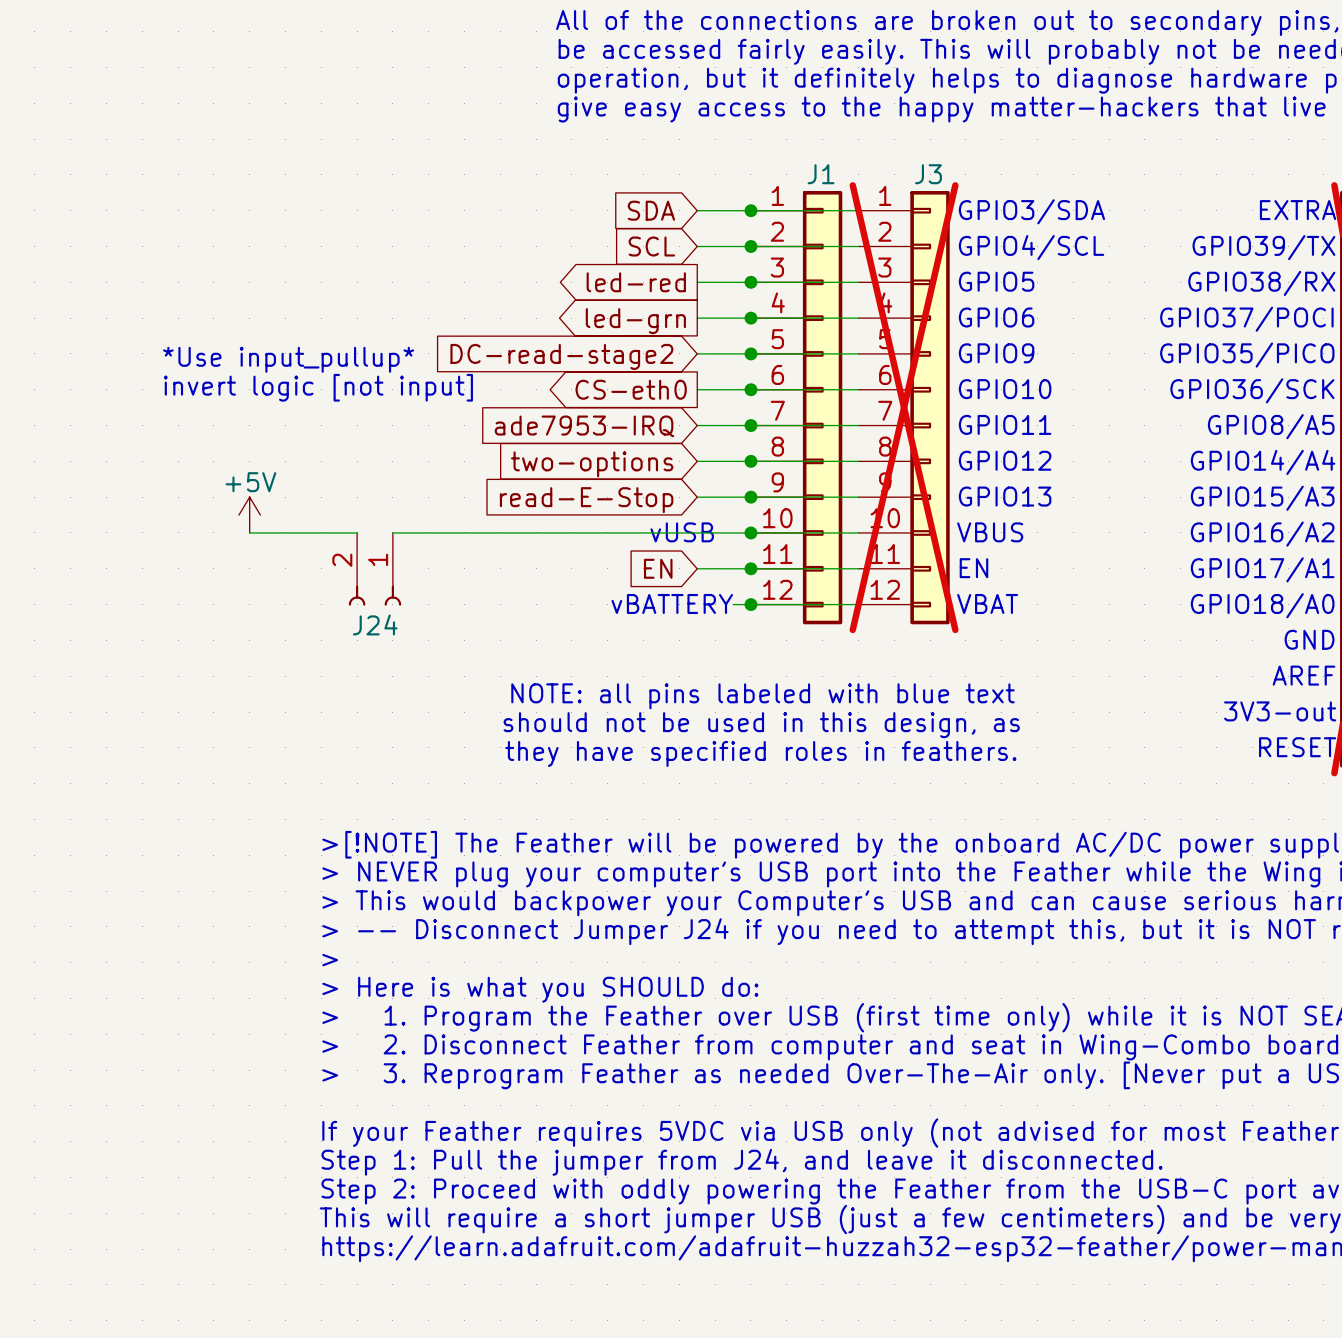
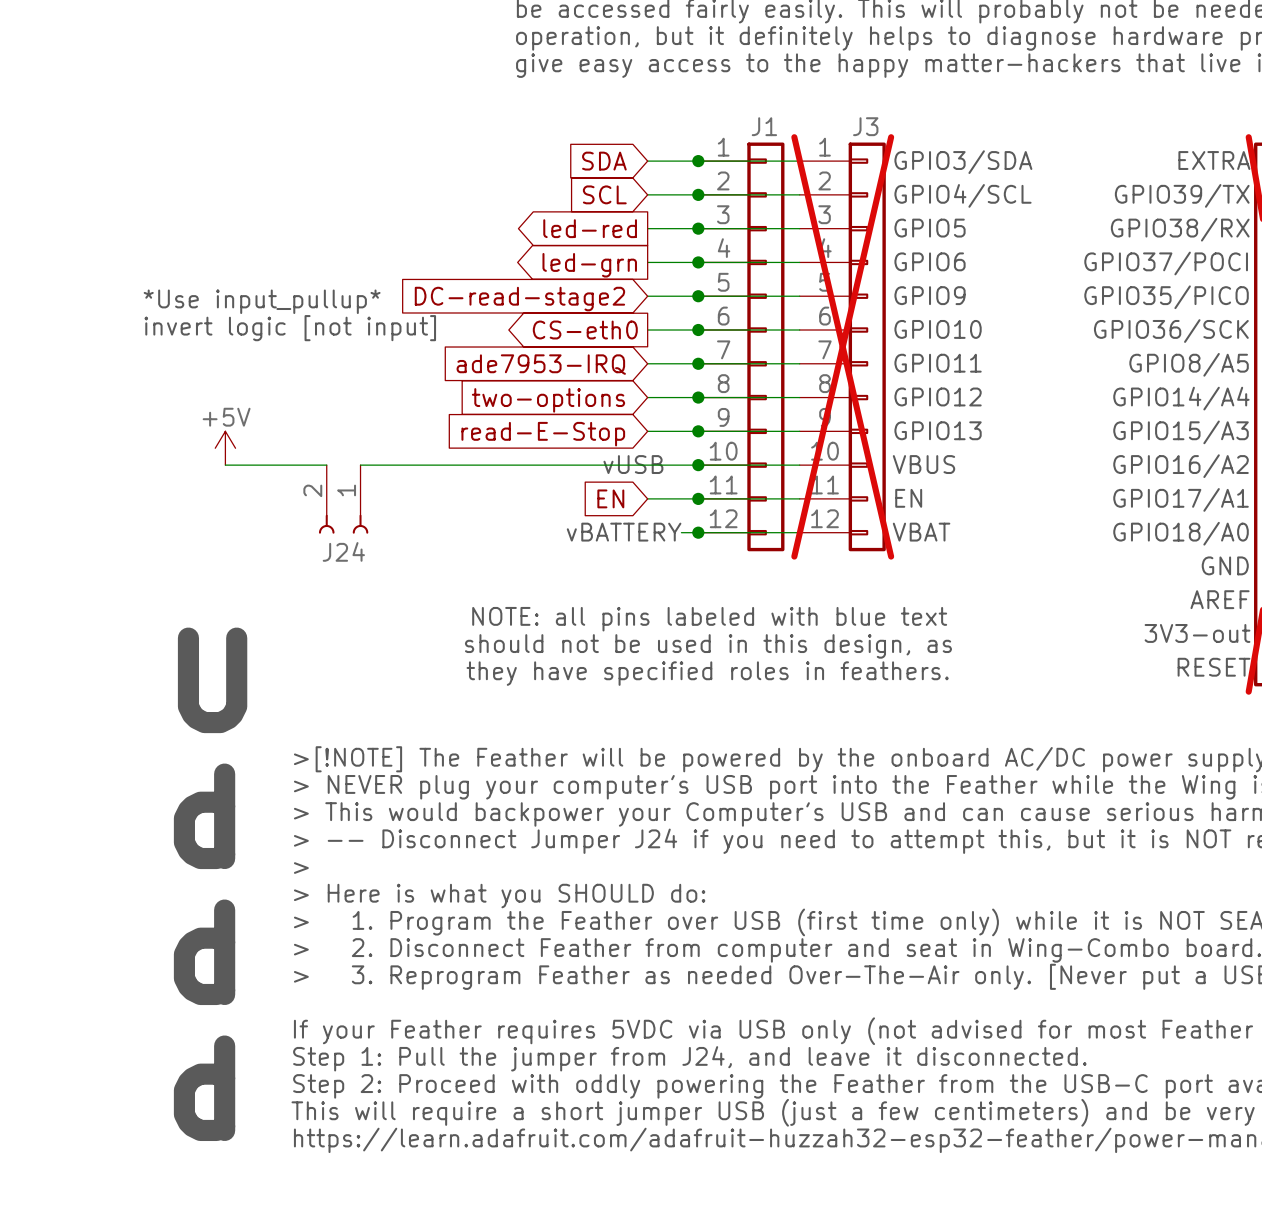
text: none -> U (212, 680)
text: none -> d (204, 816)
text: none -> d (204, 952)
text: none -> d (204, 1088)

